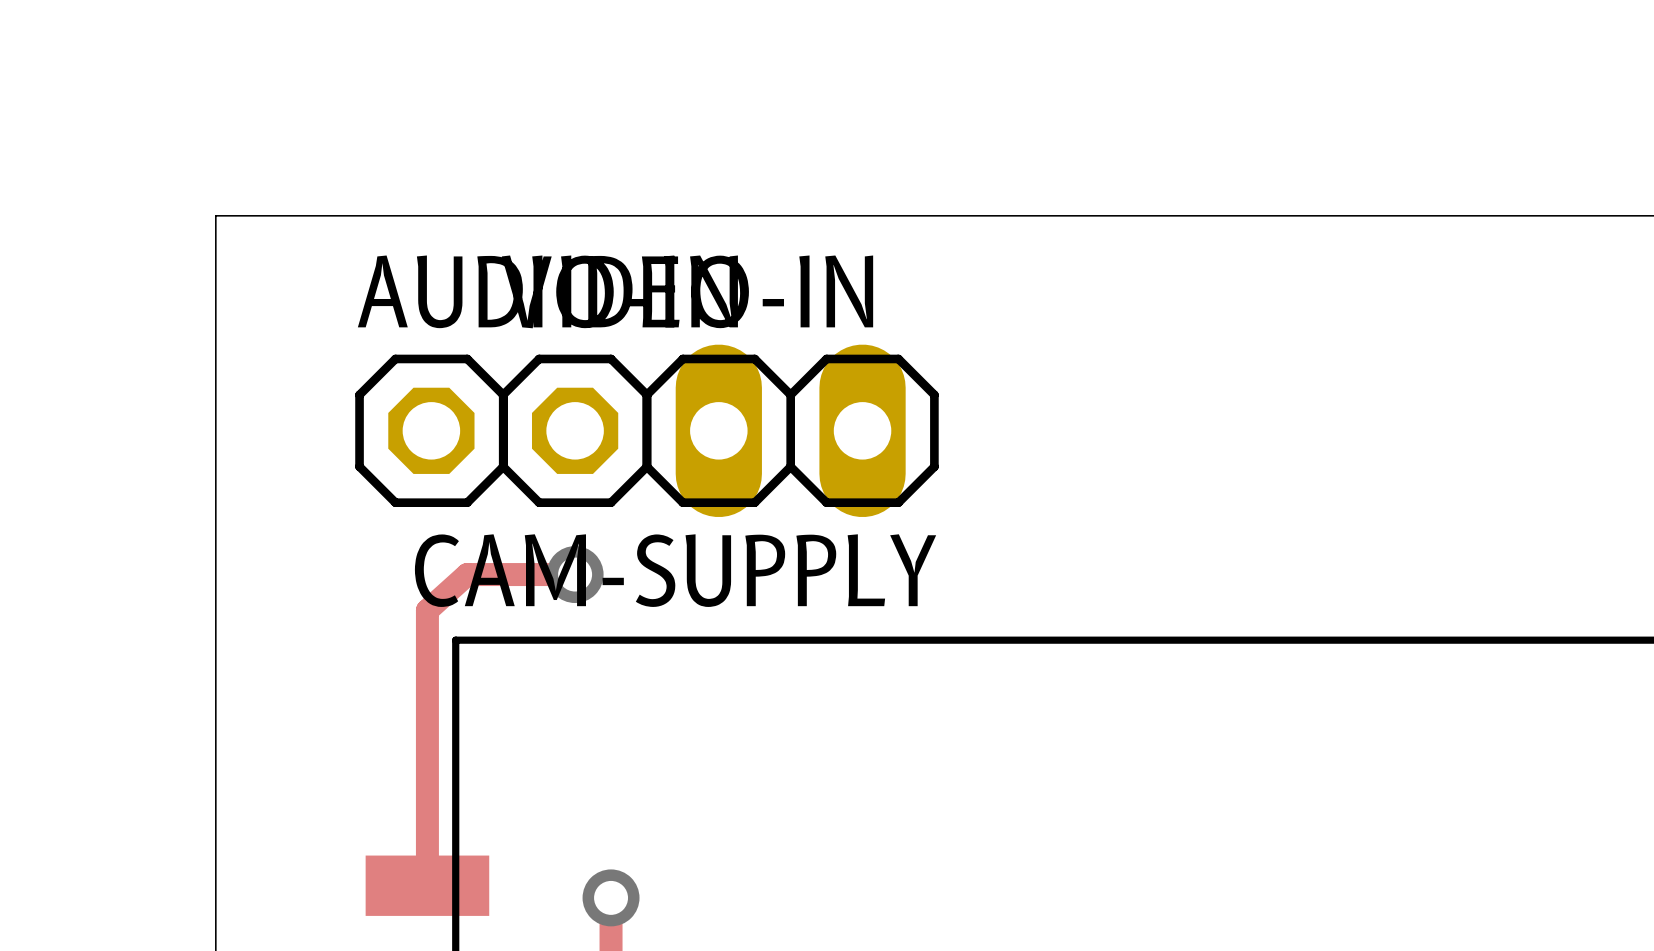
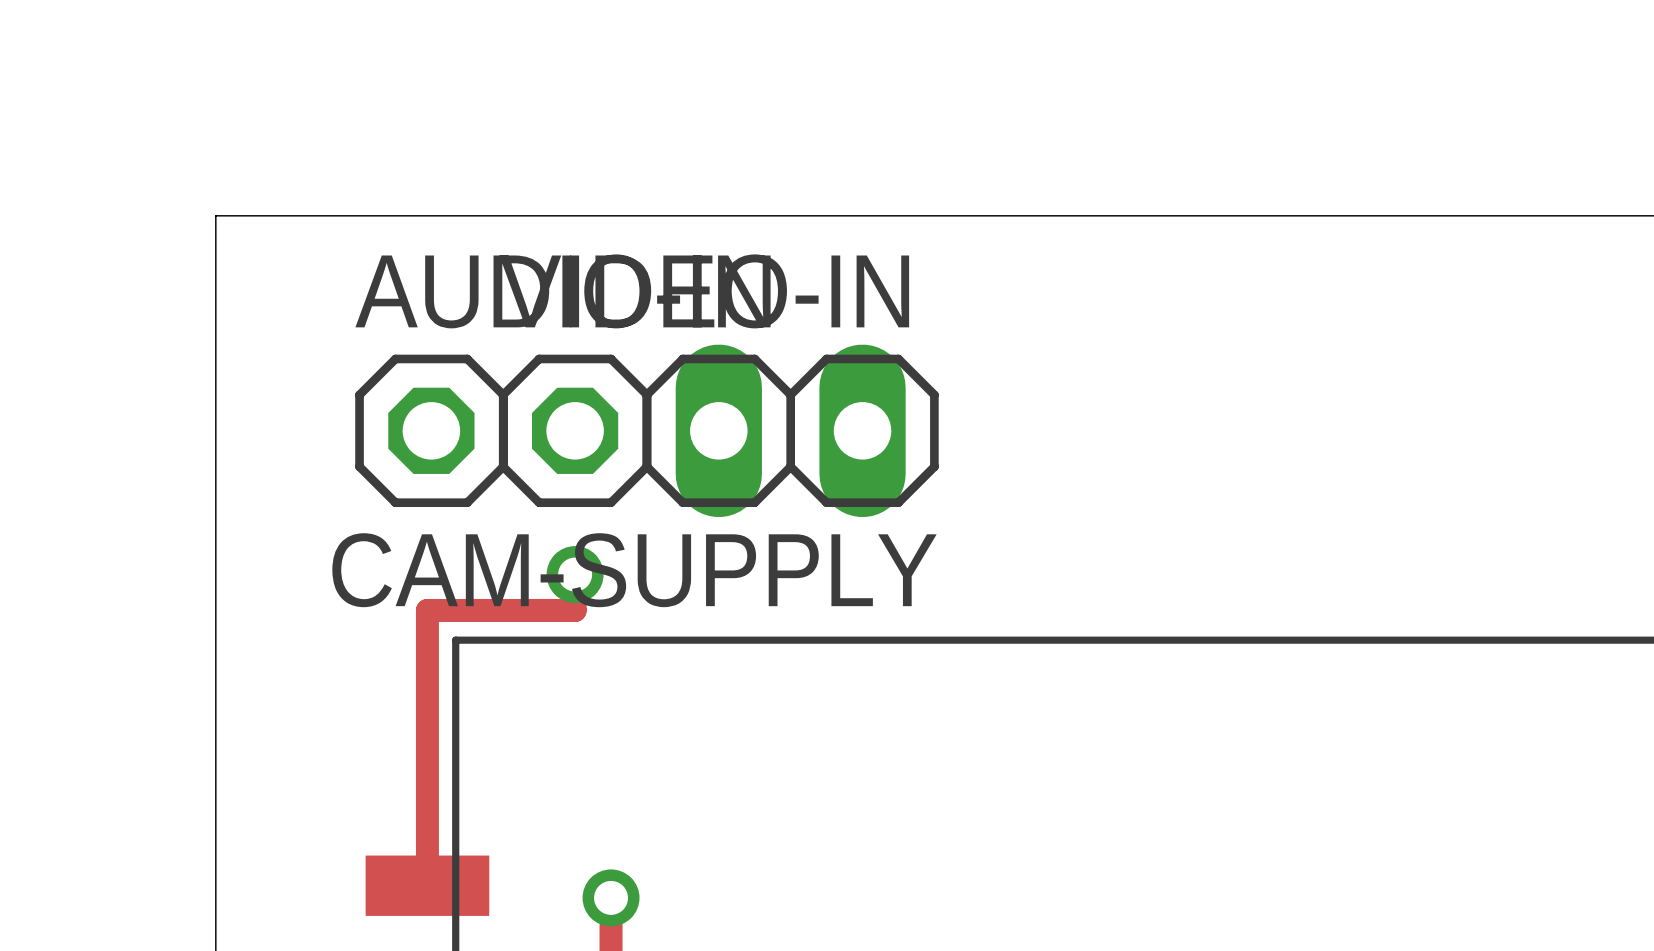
track: (575, 574) (467, 574) (427, 610) -> (575, 574) (575, 610) (427, 610)

